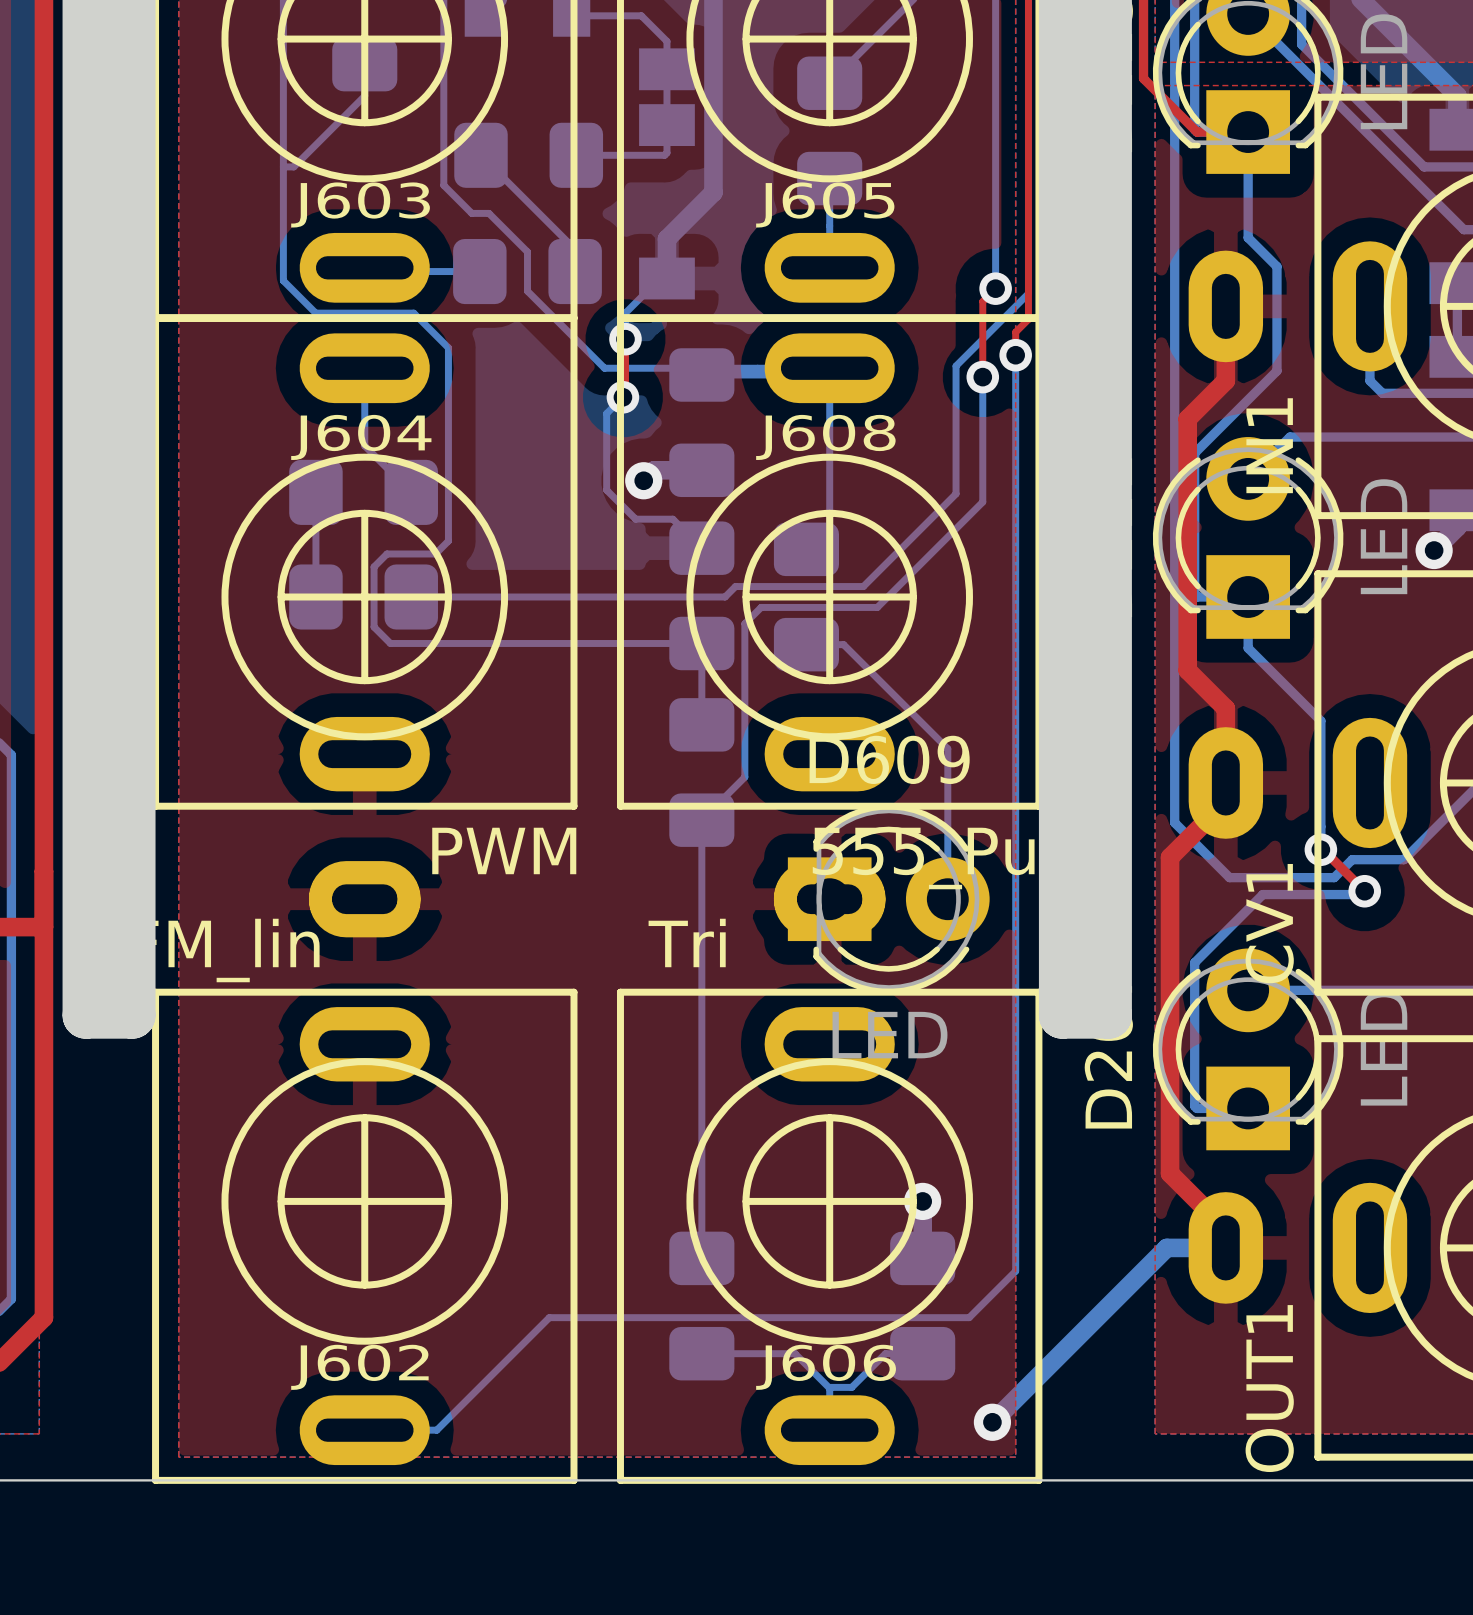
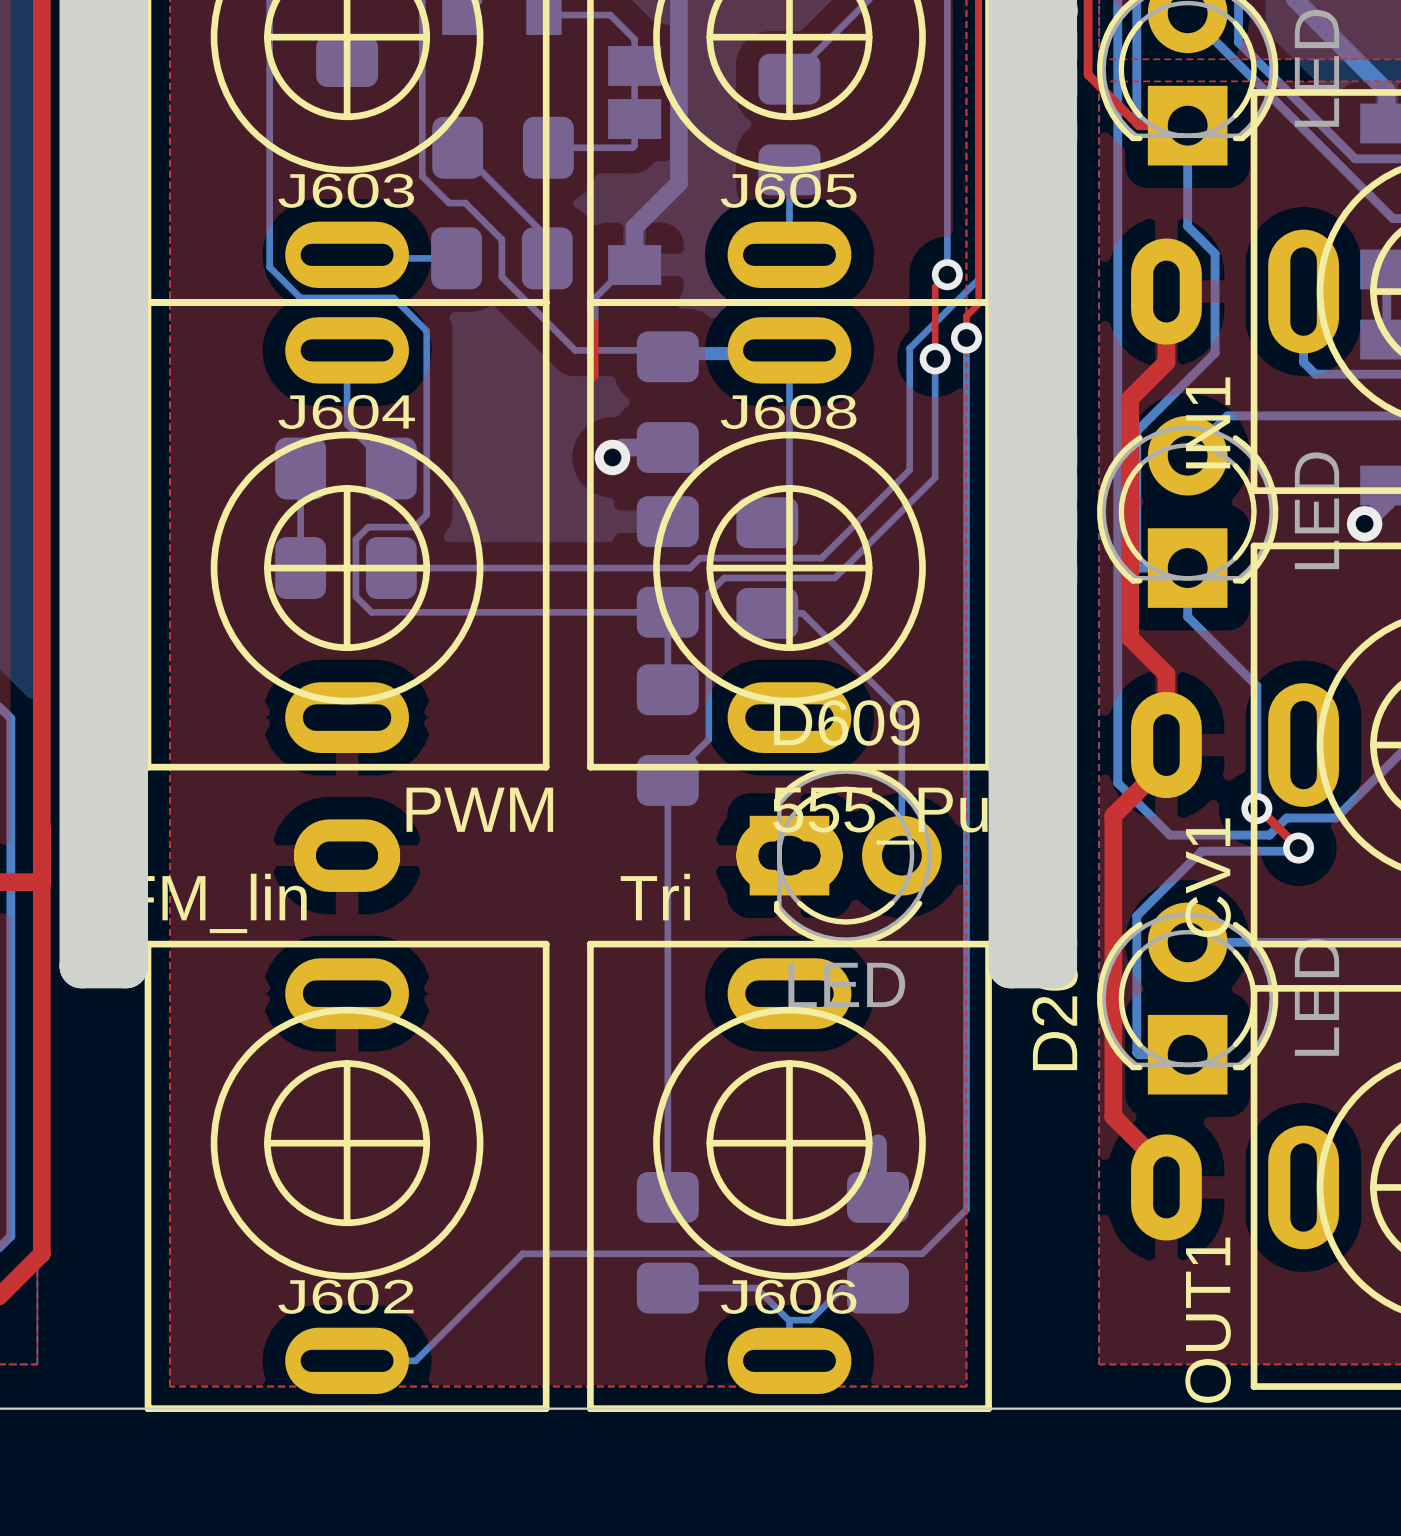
bottom track: (364, 64) (364, 96) (293, 166) (283, 166) -> none
via: (625, 339) -> none
bottom track: (622, 397) (606, 413) (606, 490) (635, 519) (672, 519) (701, 548) -> none
via: (622, 397) -> none
via: (922, 1201) -> none
bottom track: (1225, 1247) (1166, 1247) (992, 1422) -> none
via: (992, 1422) -> none

